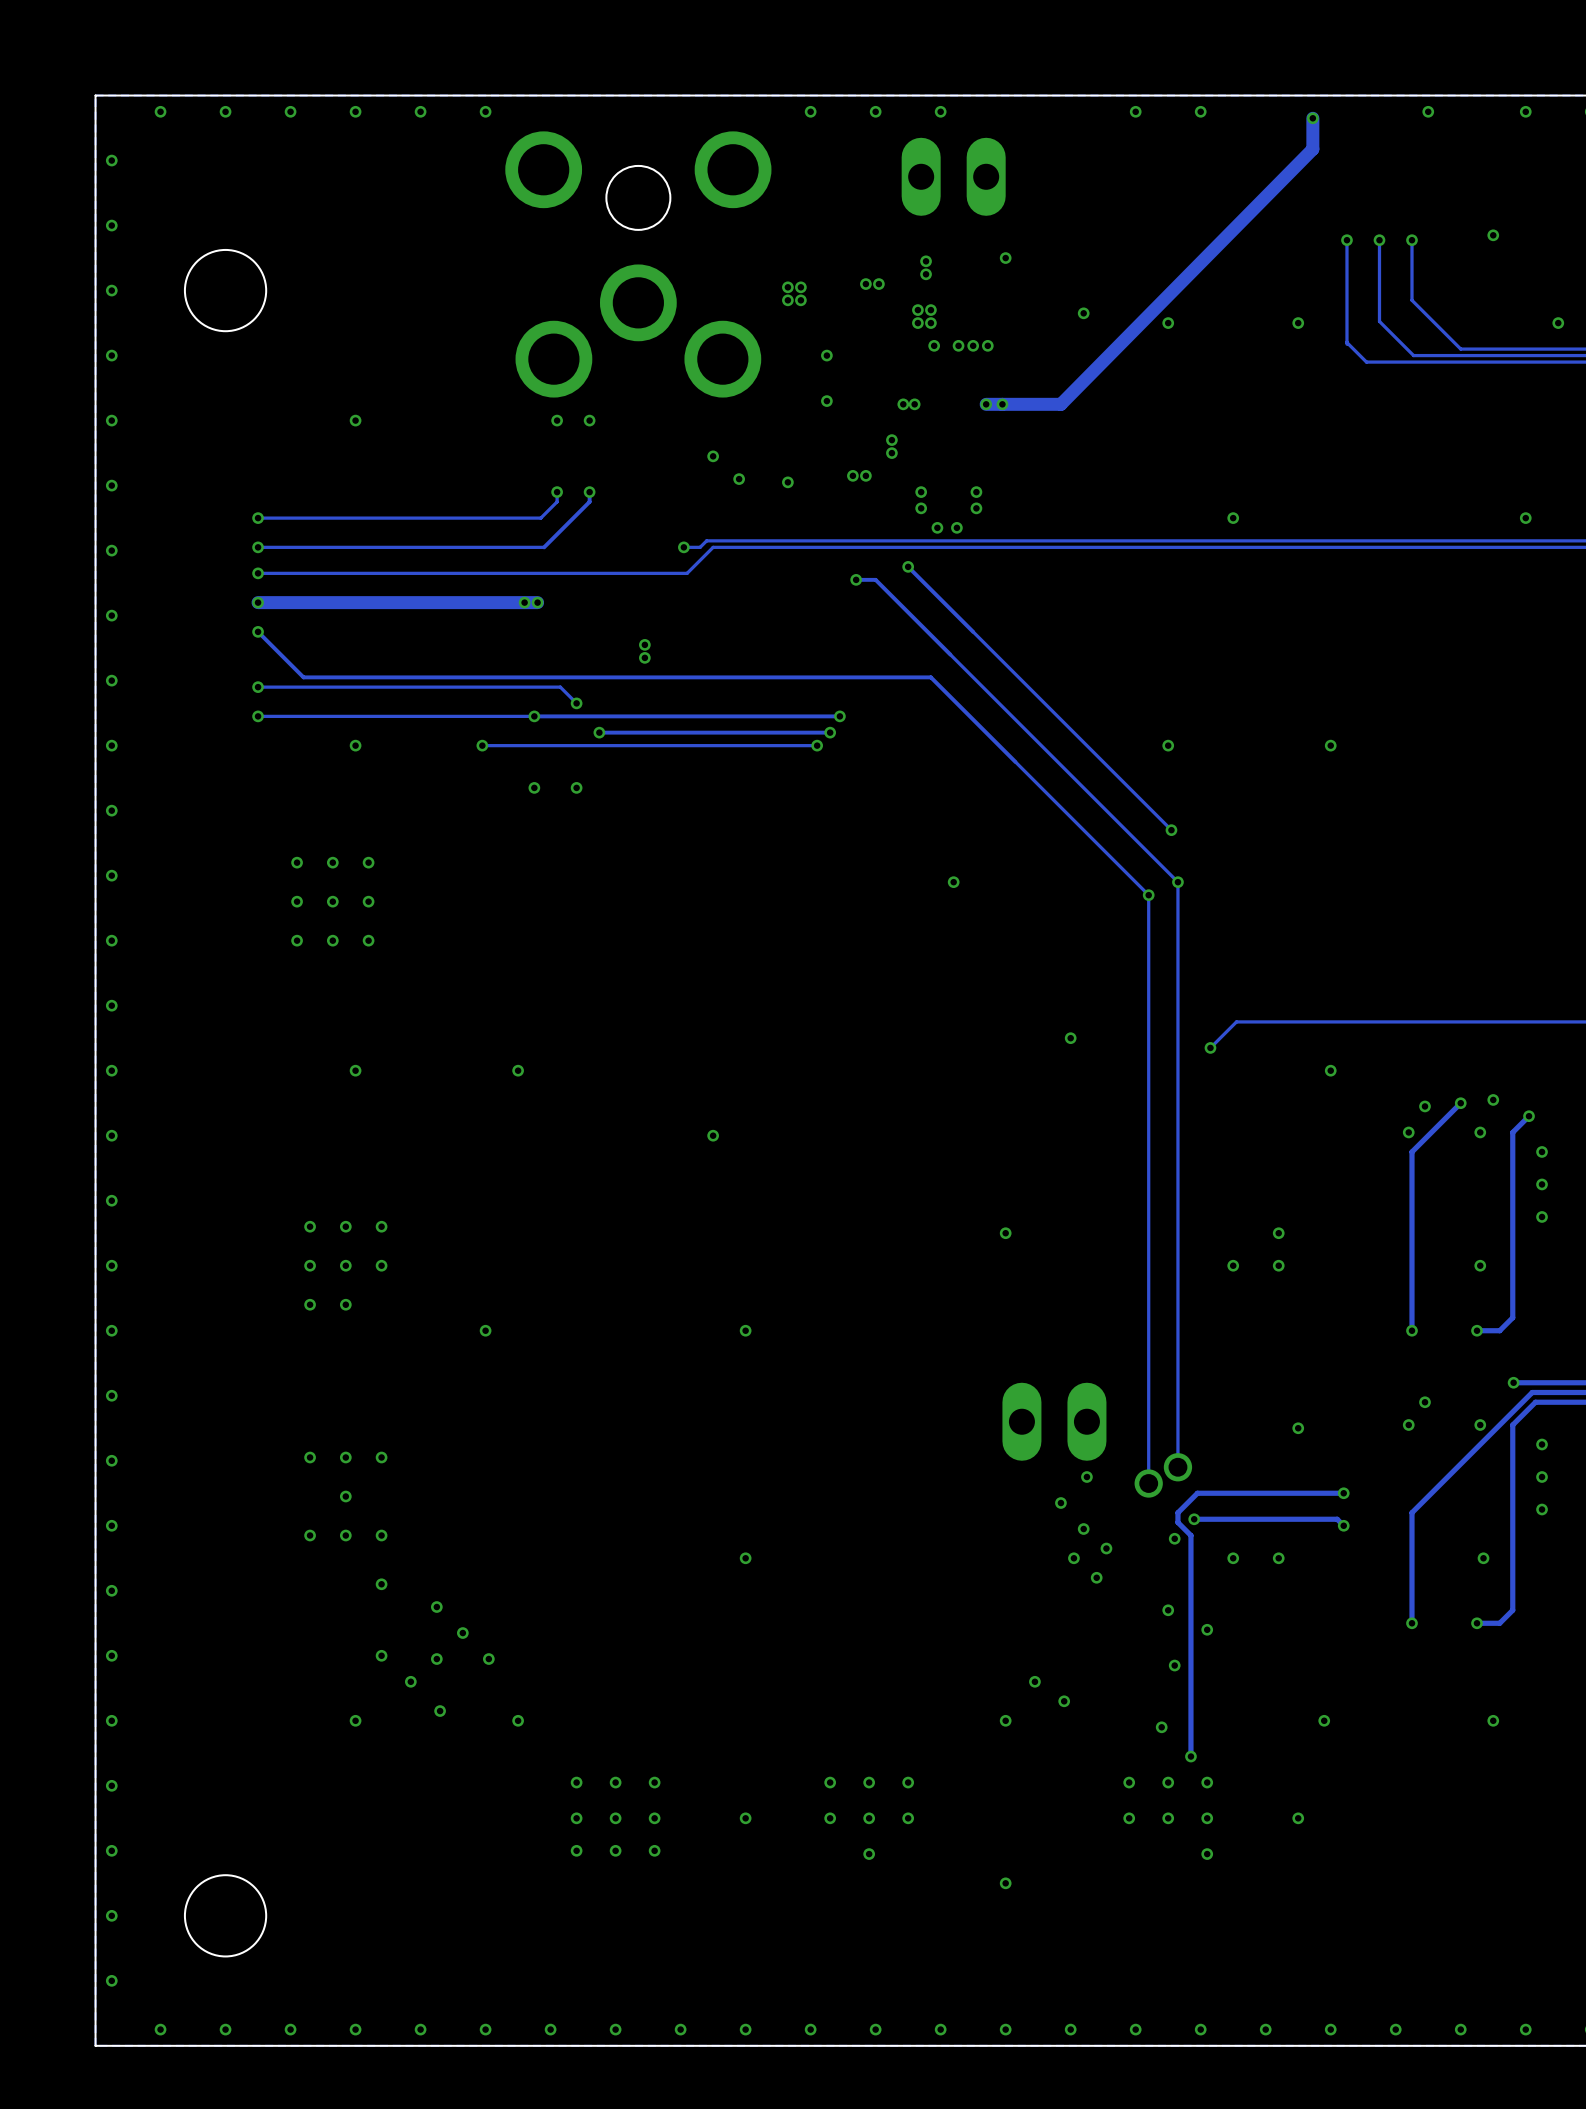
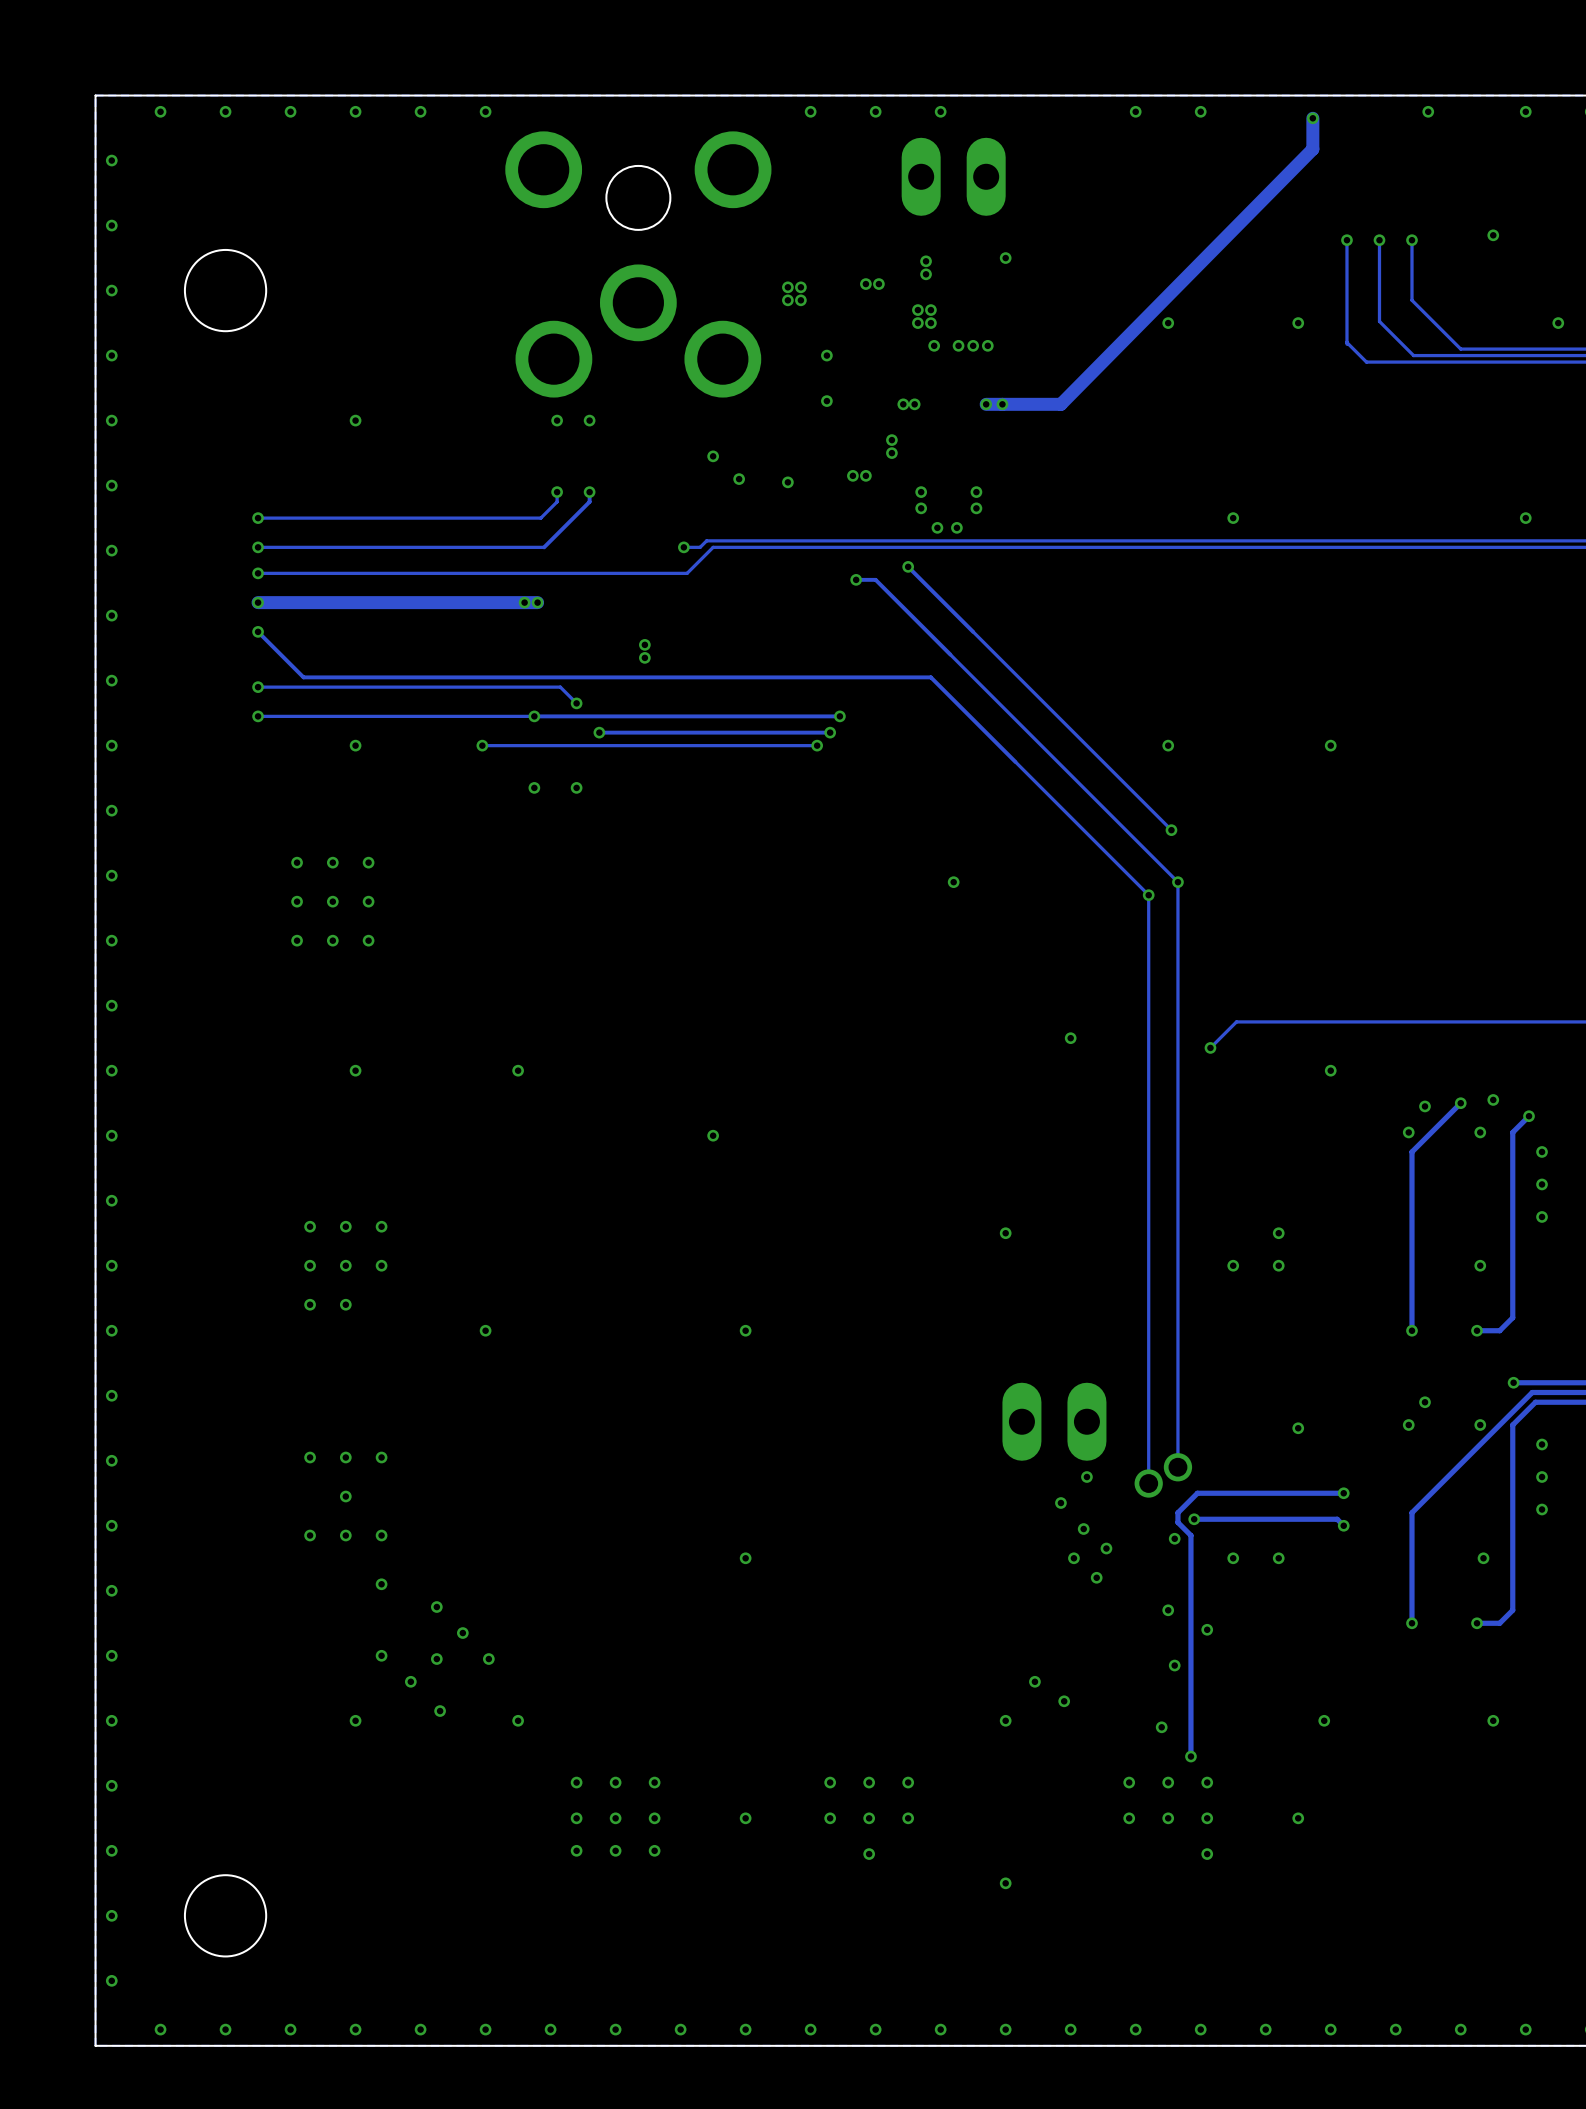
via: (1083, 313) -> none

